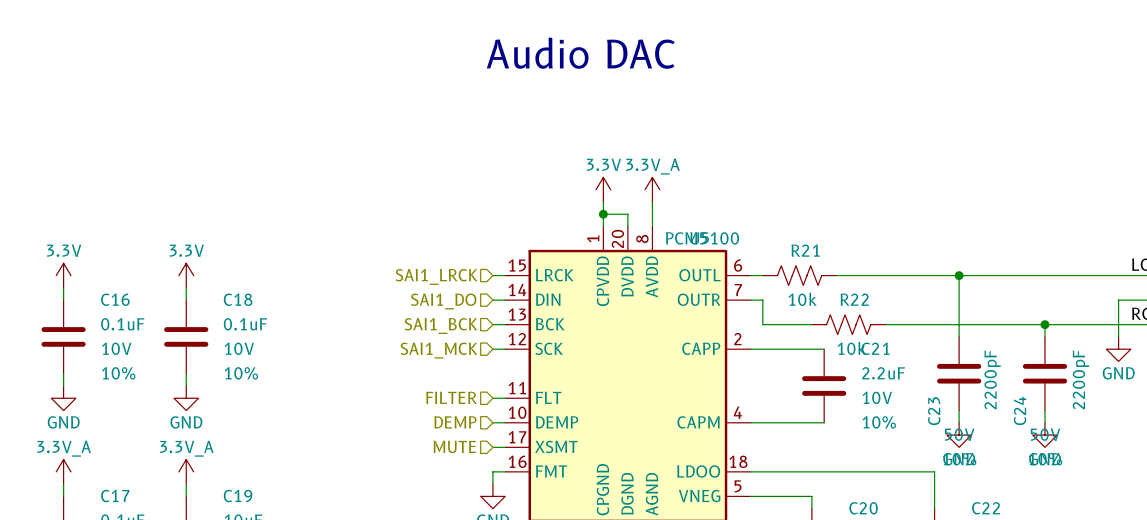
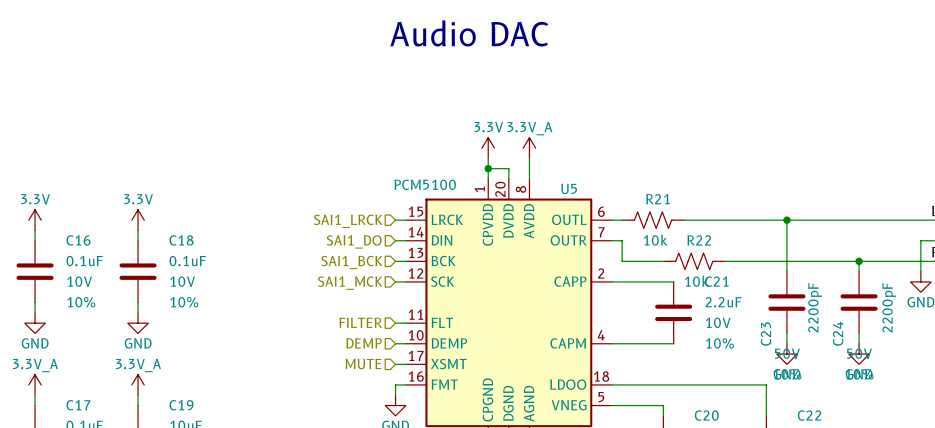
U5 value position: PCM5100 (702, 238) -> PCM5100 (425, 184)

